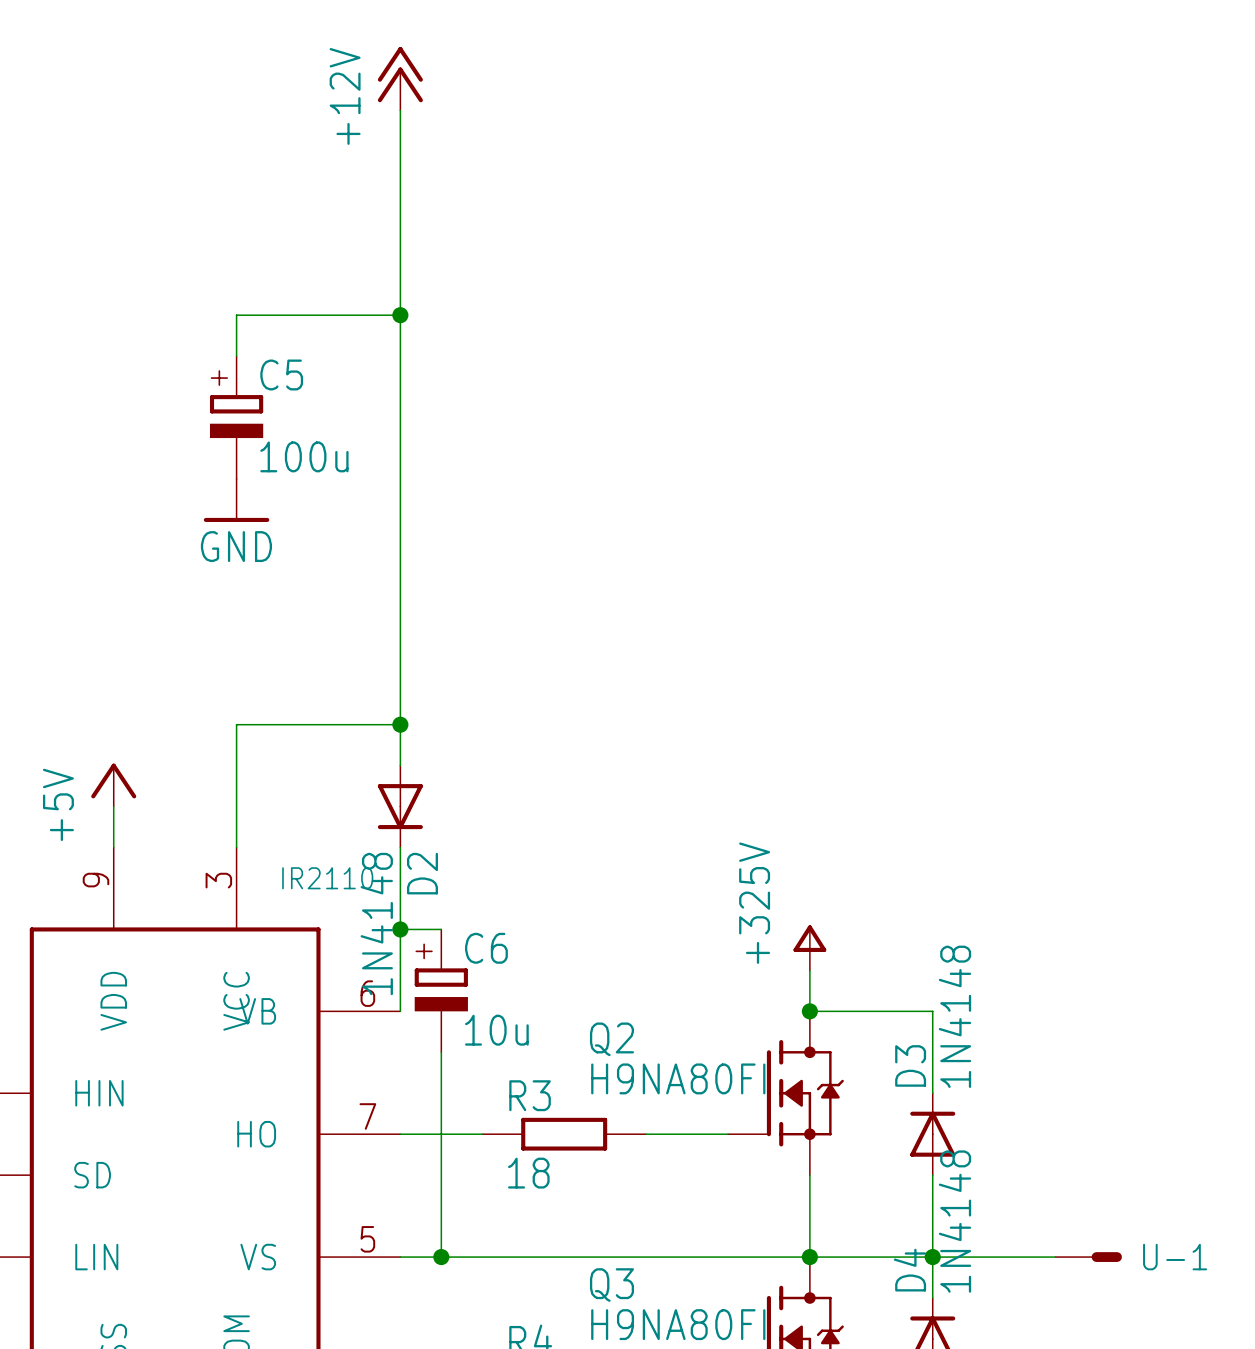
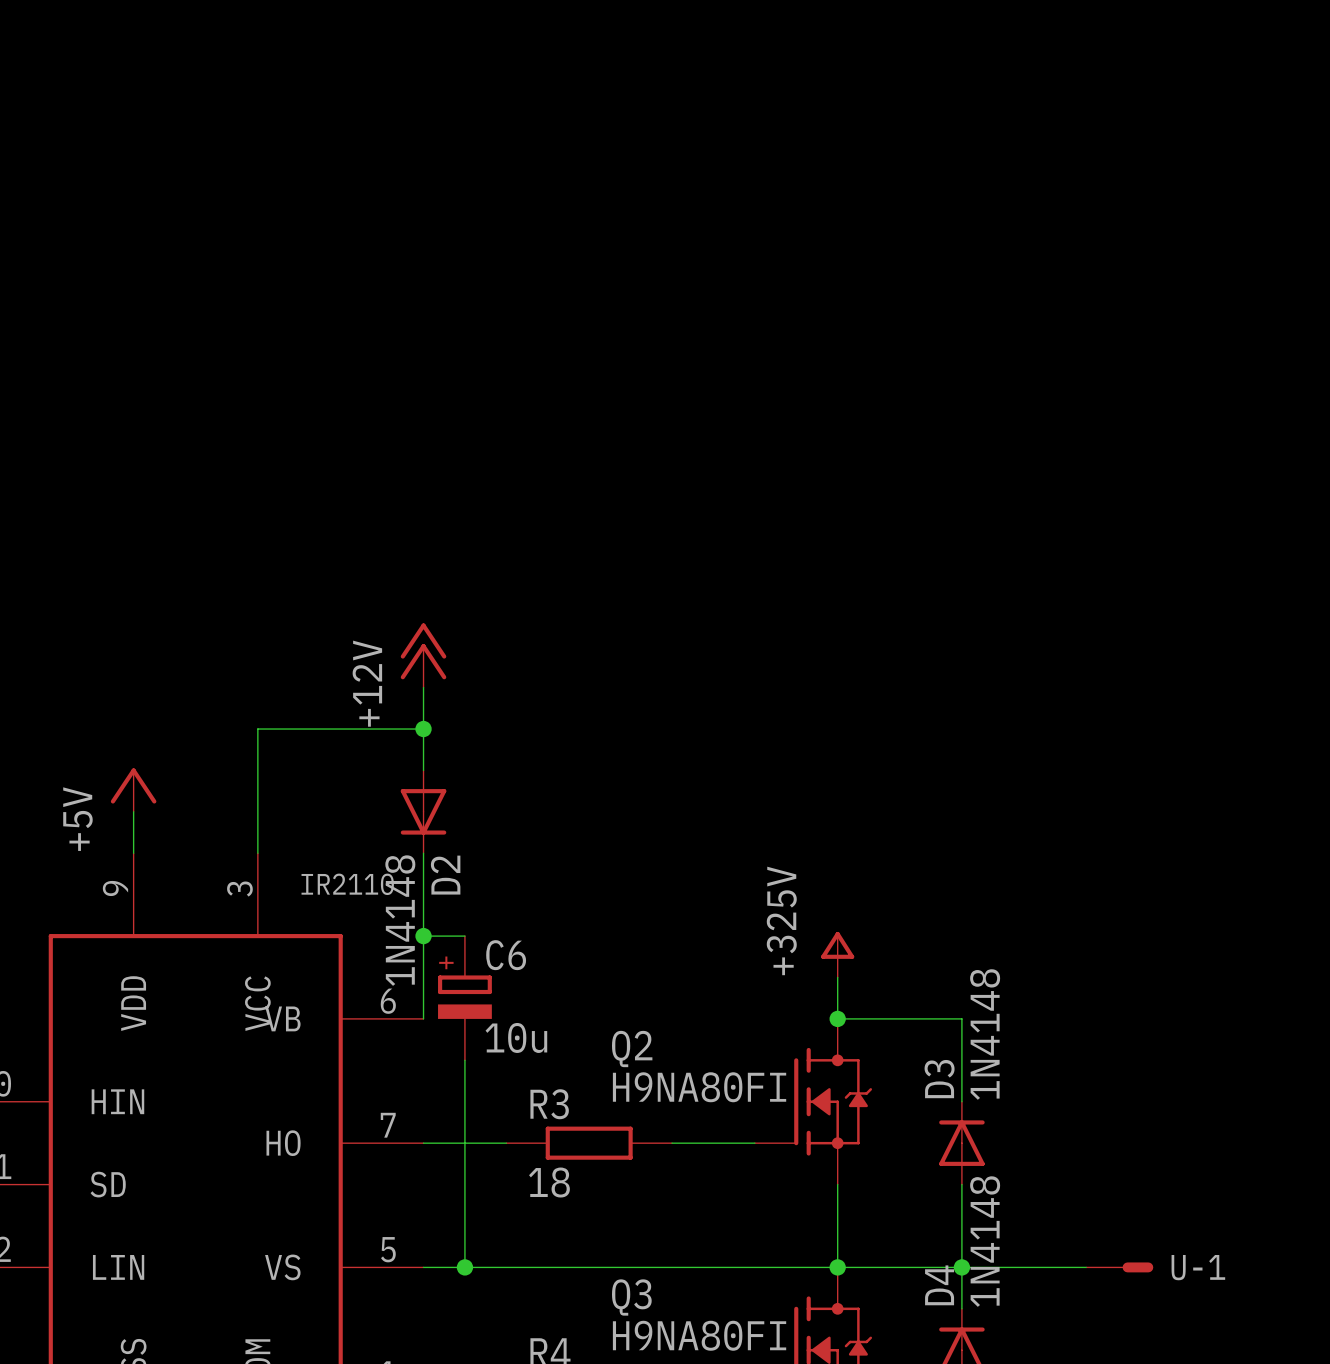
power symbol: +12V (400, 78) -> none
wire: (400, 110) (400, 683) -> none
wire: (400, 315) (236, 315) (236, 356) -> none
junction: (400, 315) -> none
C5: 100u (236, 417) -> none
power symbol: GND (236, 500) -> none
power symbol: none -> +12V (423, 655)

